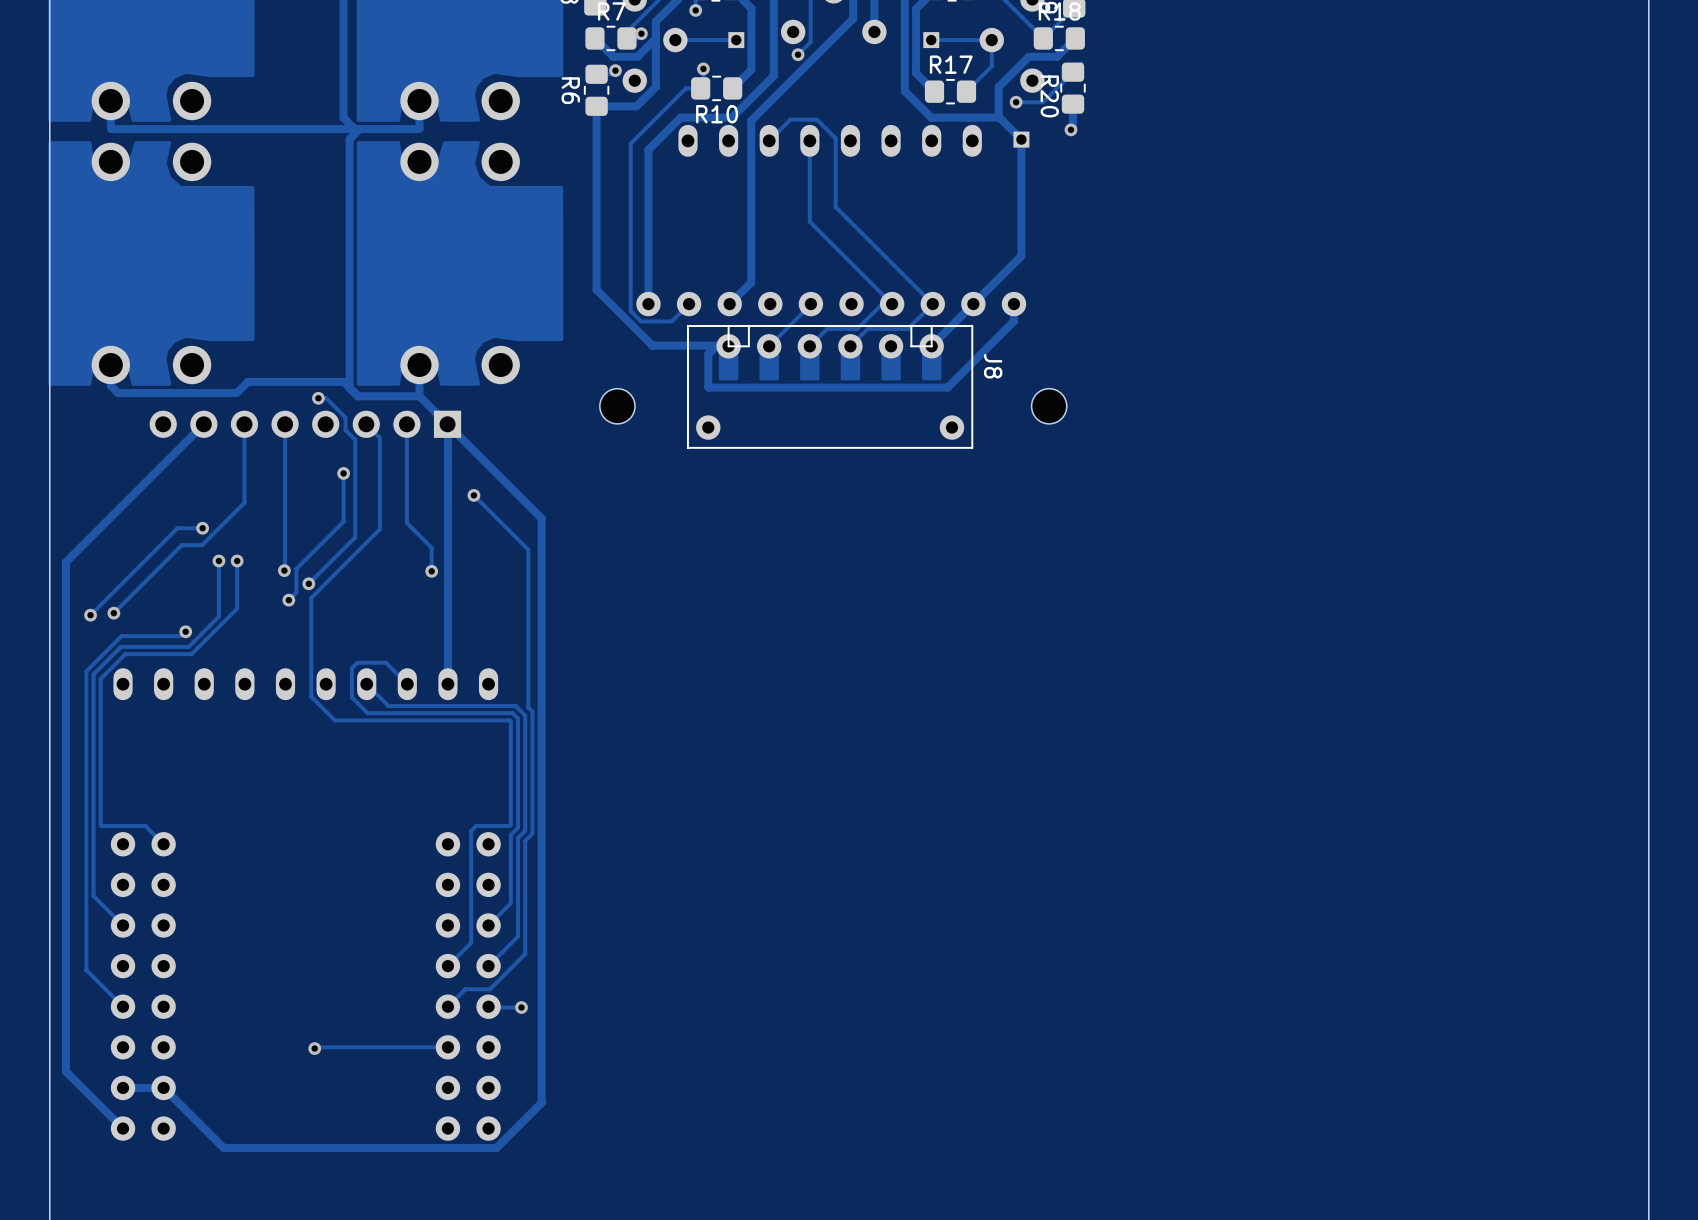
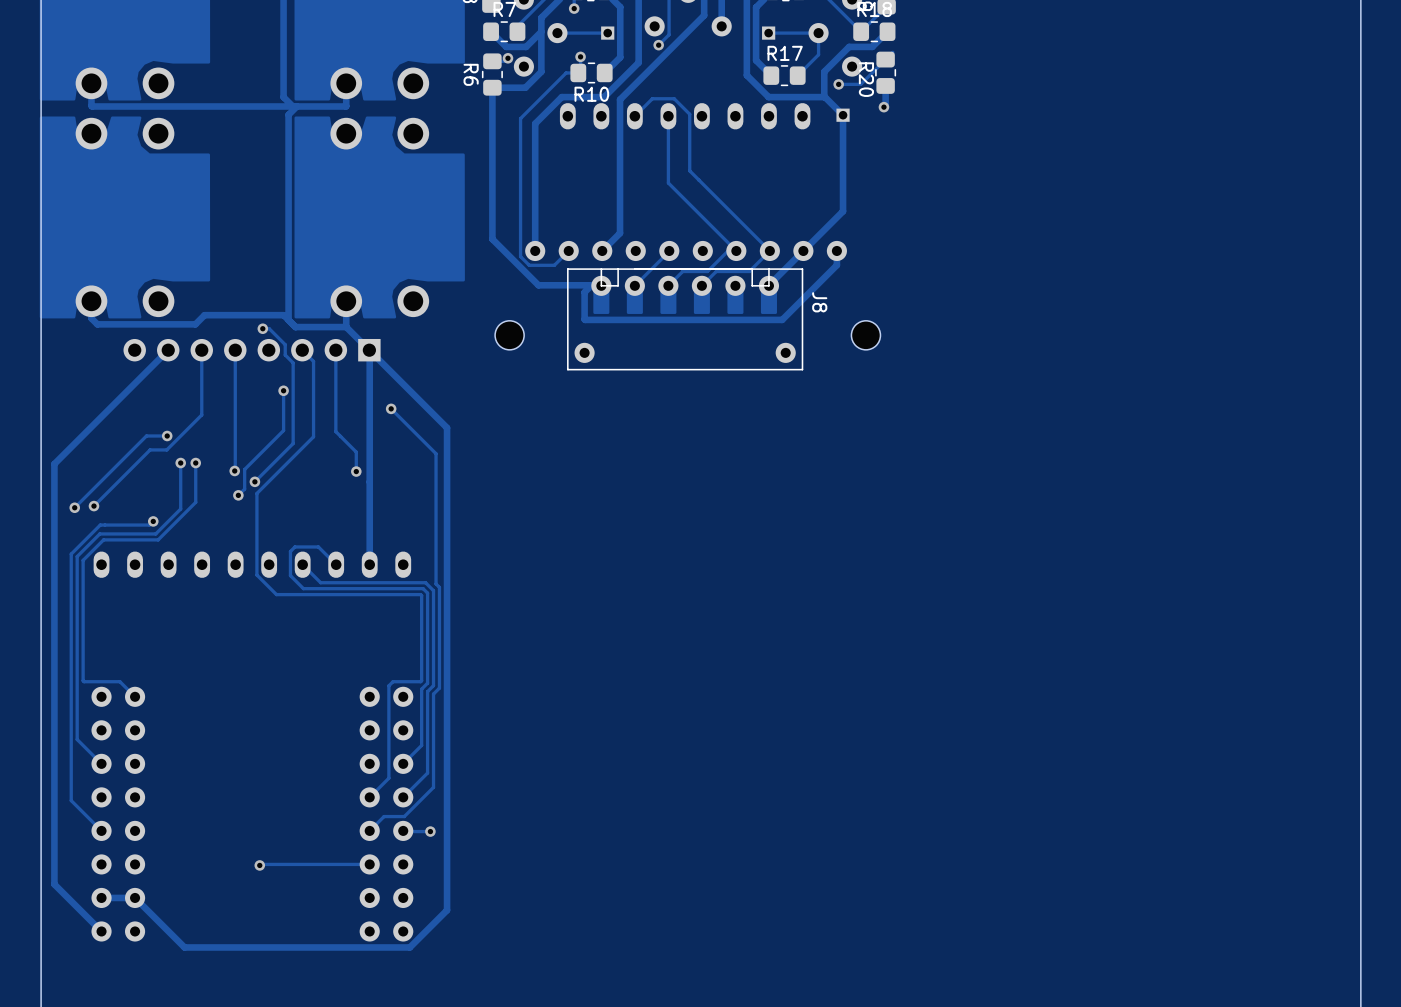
via: (641, 33) -> none

